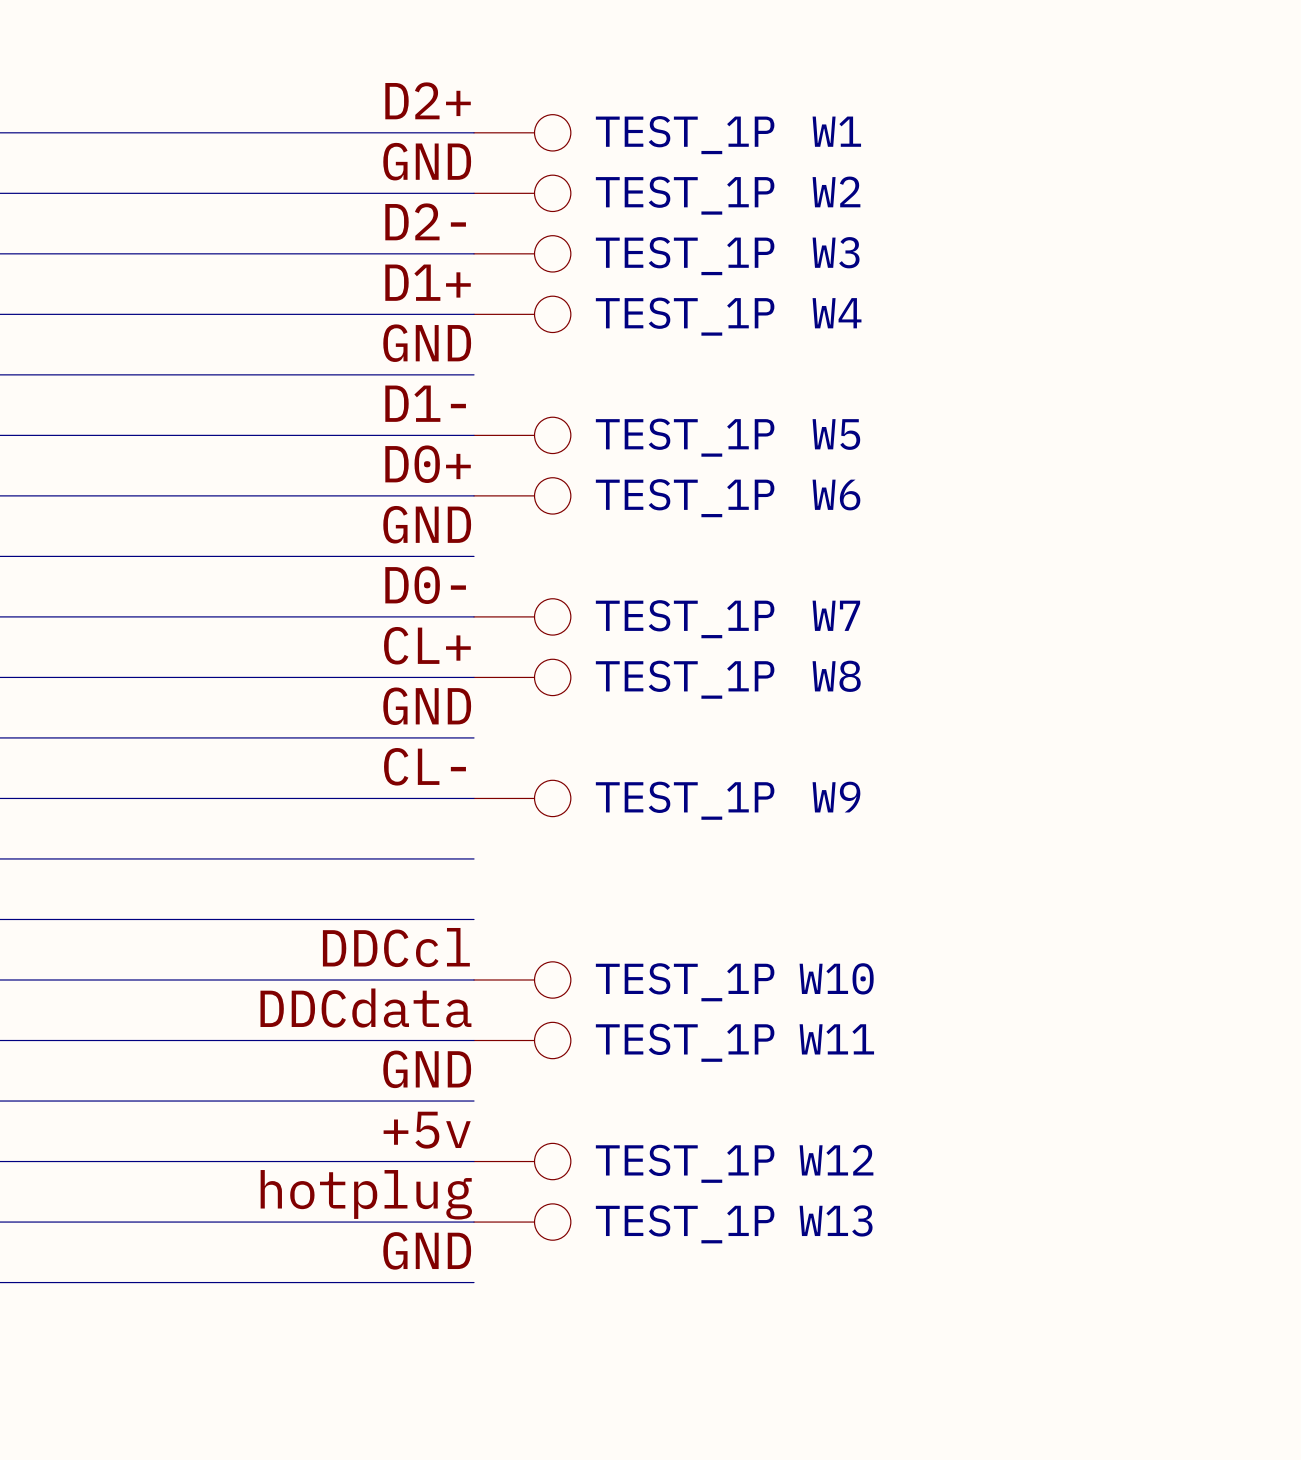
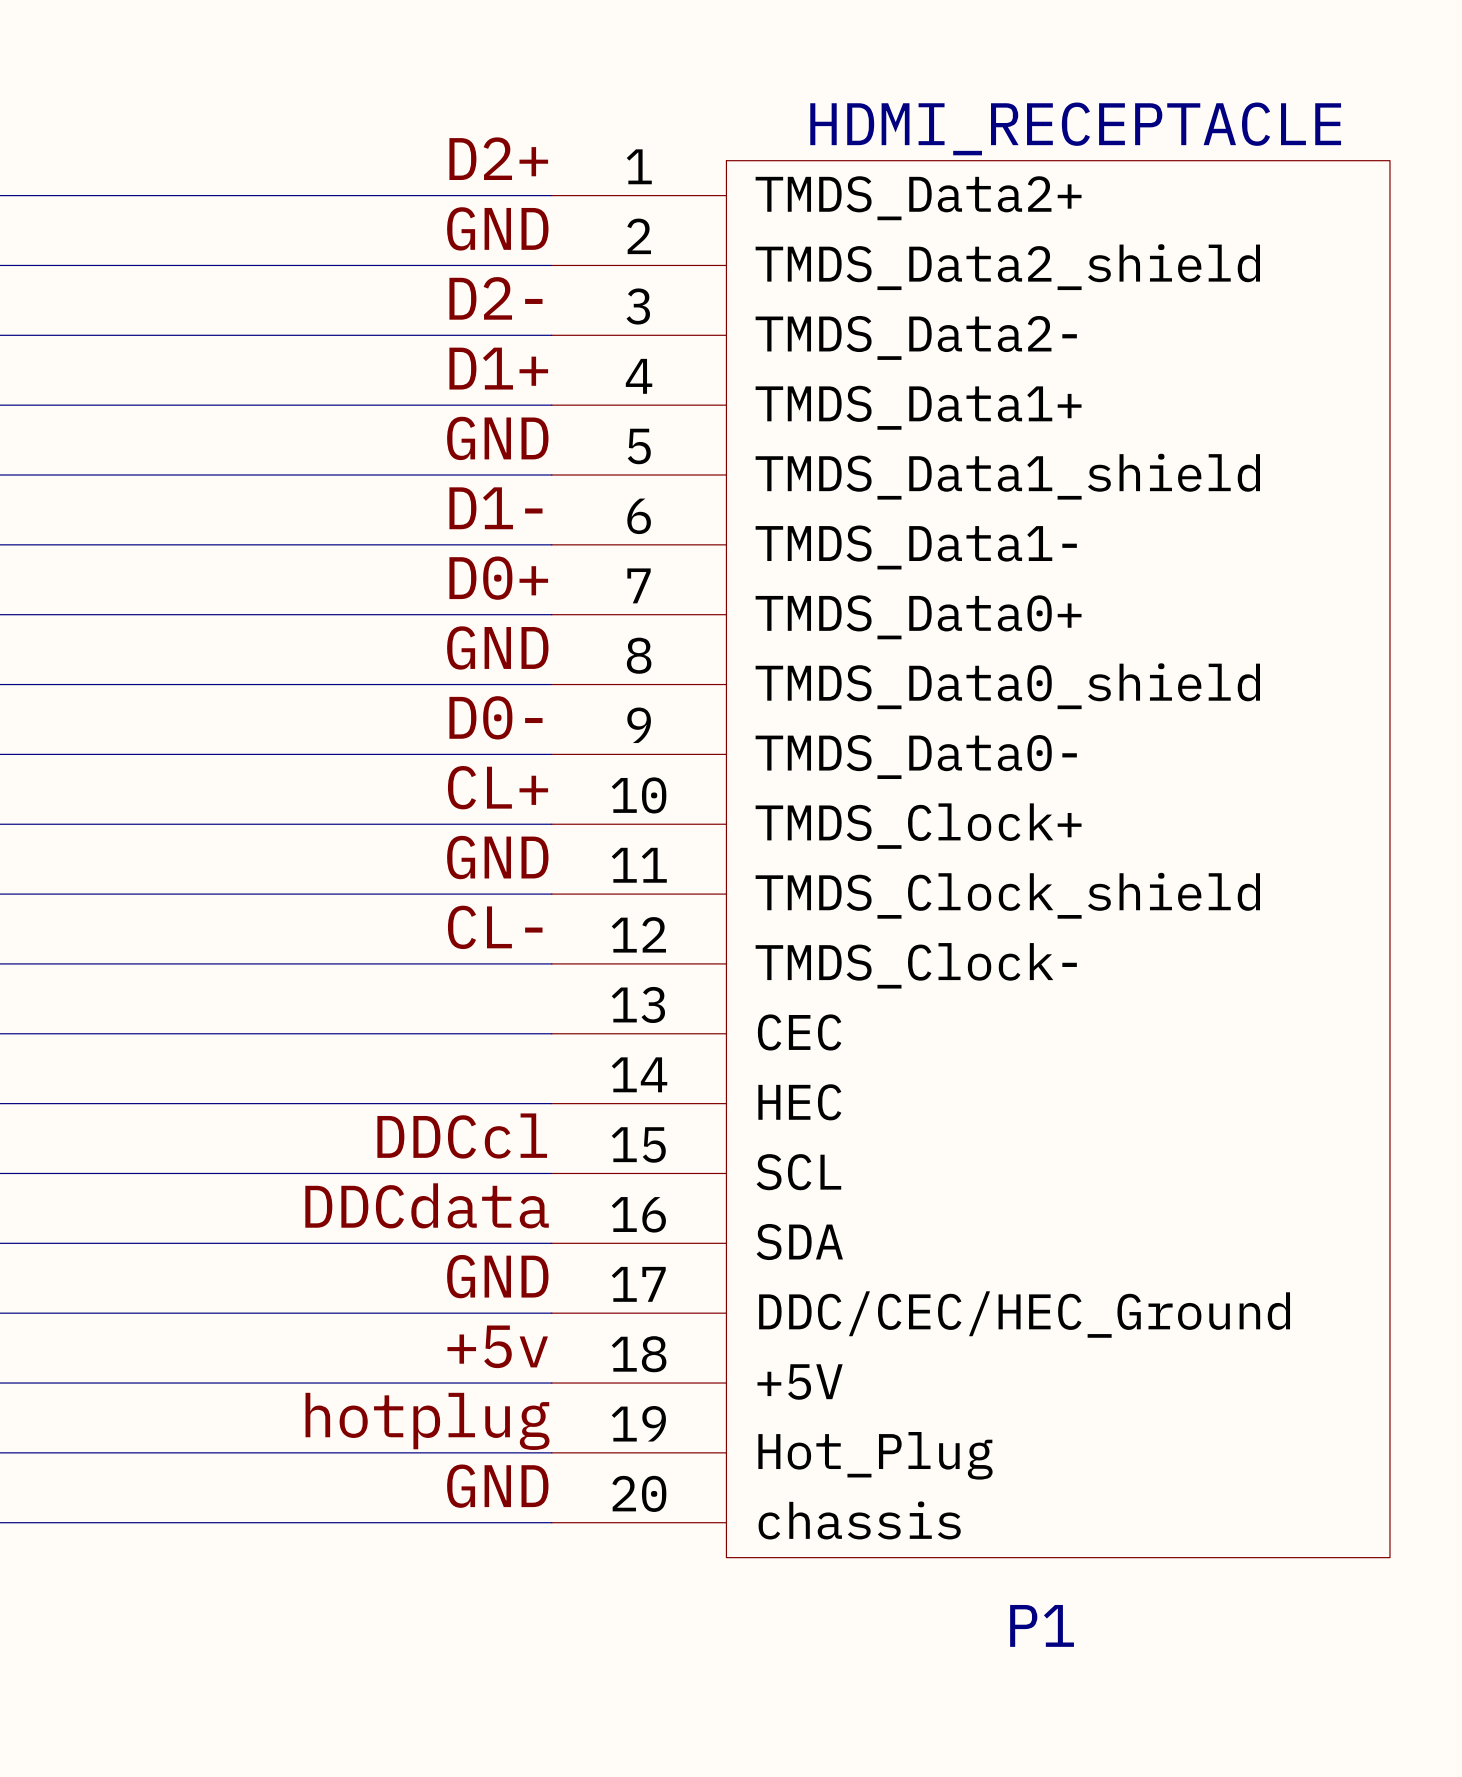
W1: TEST_1P (522, 132) -> none
W2: TEST_1P (522, 193) -> none
W3: TEST_1P (522, 253) -> none
W4: TEST_1P (522, 314) -> none
W5: TEST_1P (522, 435) -> none
W6: TEST_1P (522, 495) -> none
W7: TEST_1P (522, 616) -> none
W8: TEST_1P (522, 677) -> none
P1: none -> HDMI_RECEPTACLE (970, 859)
W9: TEST_1P (522, 798) -> none
W10: TEST_1P (522, 979) -> none
W11: TEST_1P (522, 1040) -> none
W12: TEST_1P (522, 1161) -> none
W13: TEST_1P (522, 1222) -> none

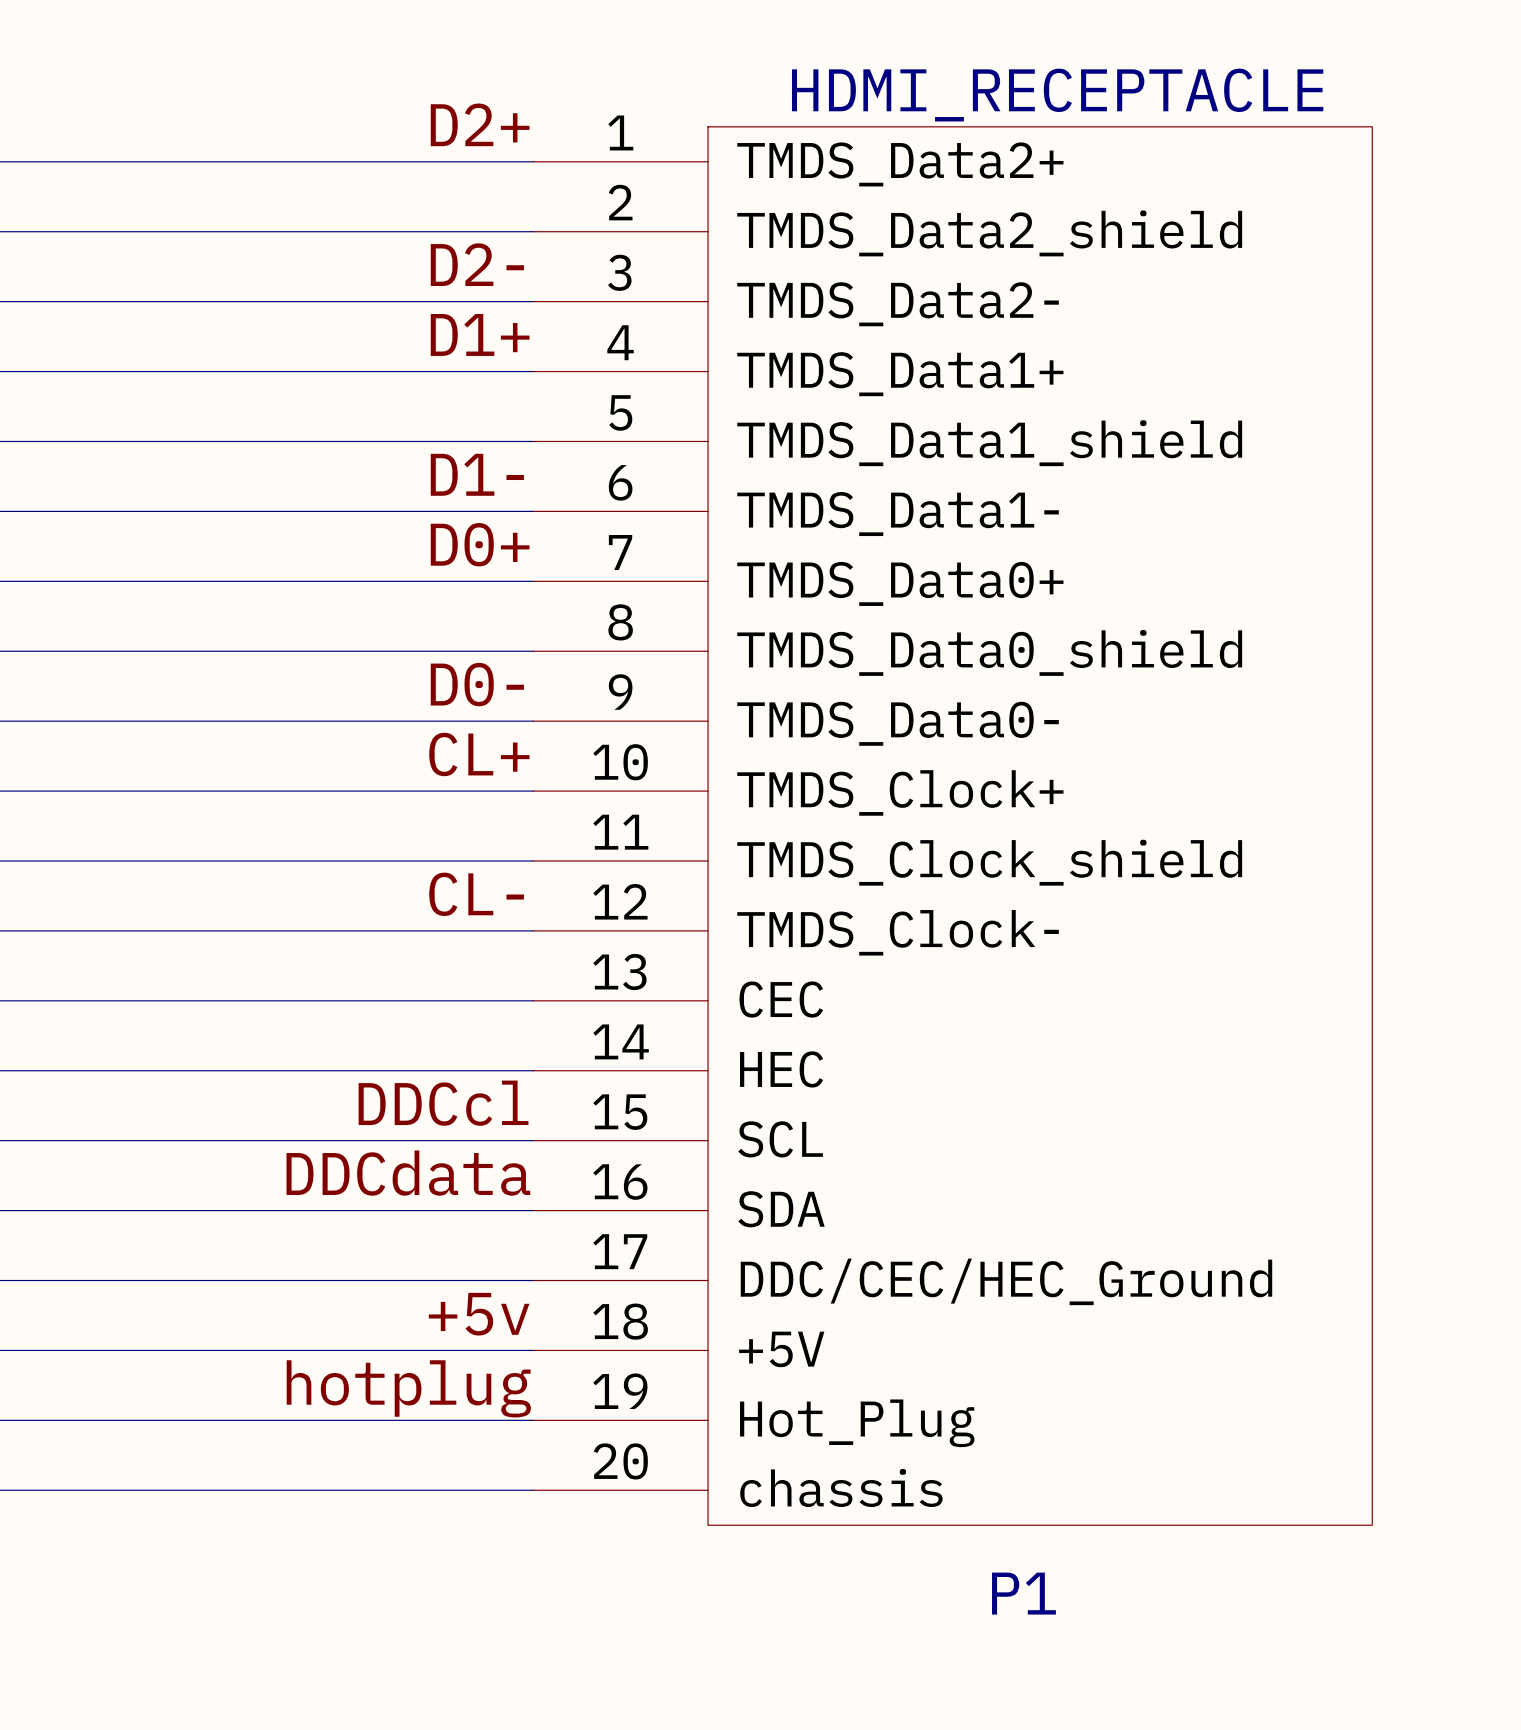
label: GND (497, 228) -> none
label: GND (497, 438) -> none
label: GND (497, 647) -> none
label: GND (497, 857) -> none
label: GND (497, 1276) -> none
label: GND (497, 1486) -> none

